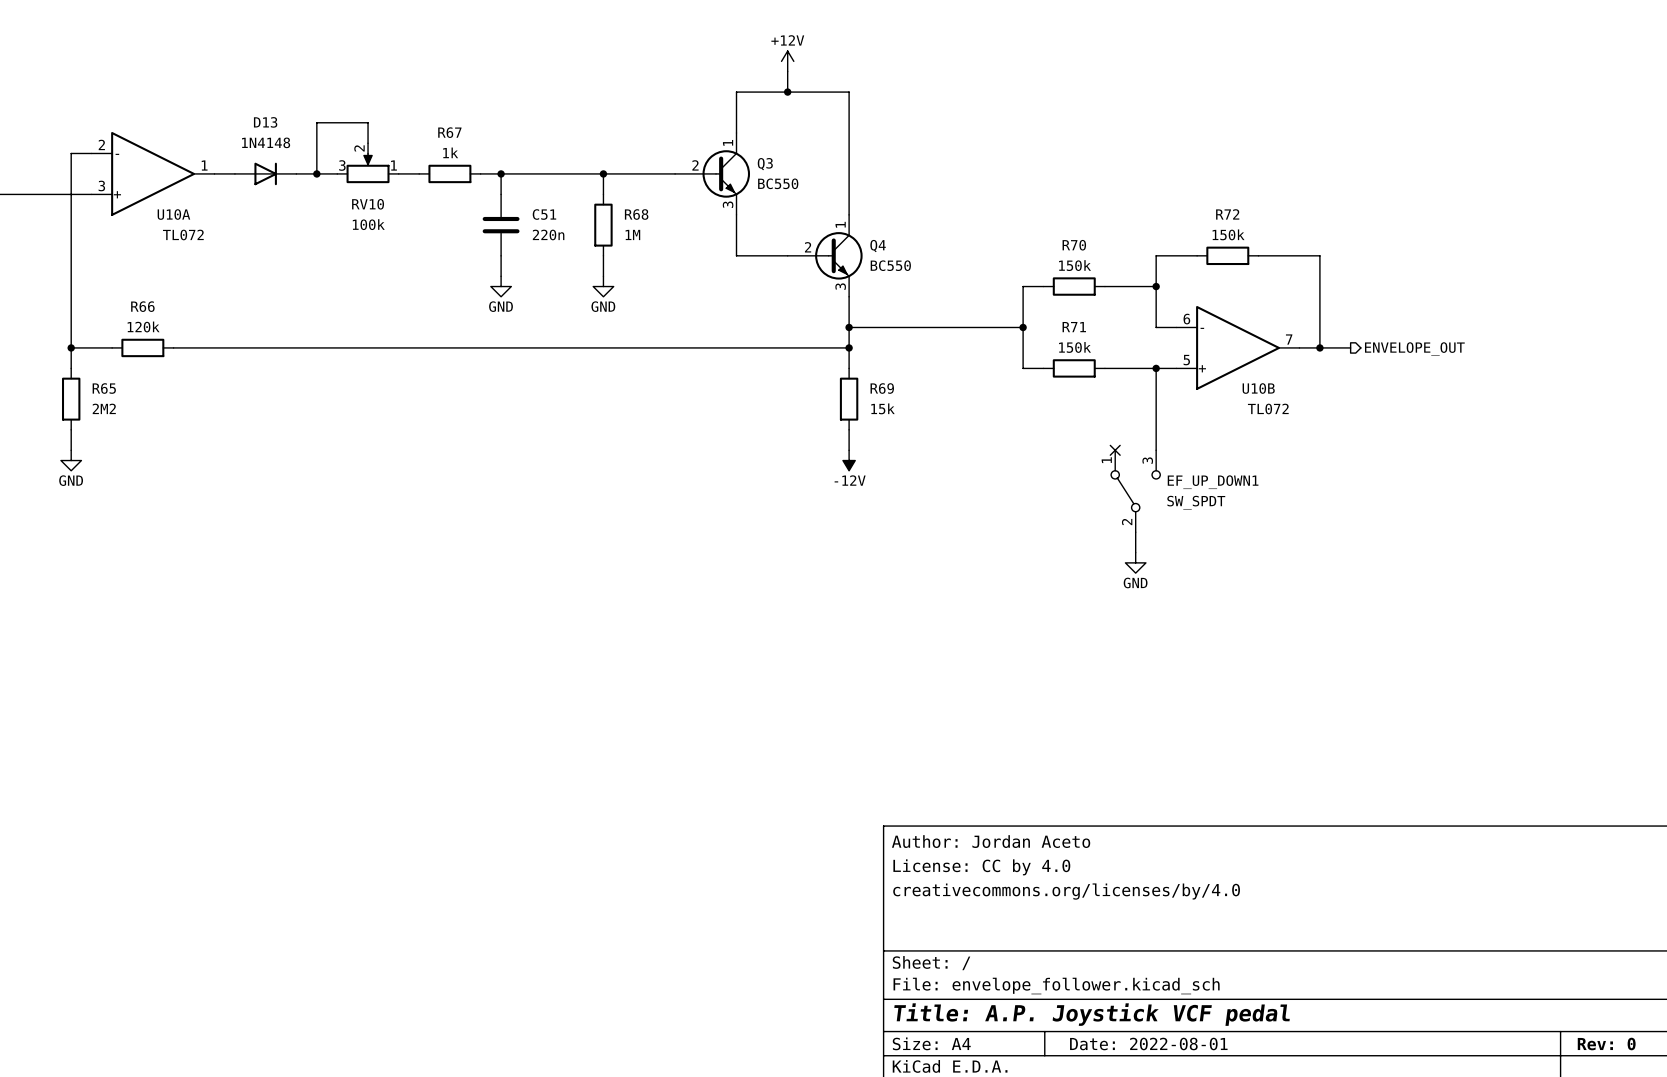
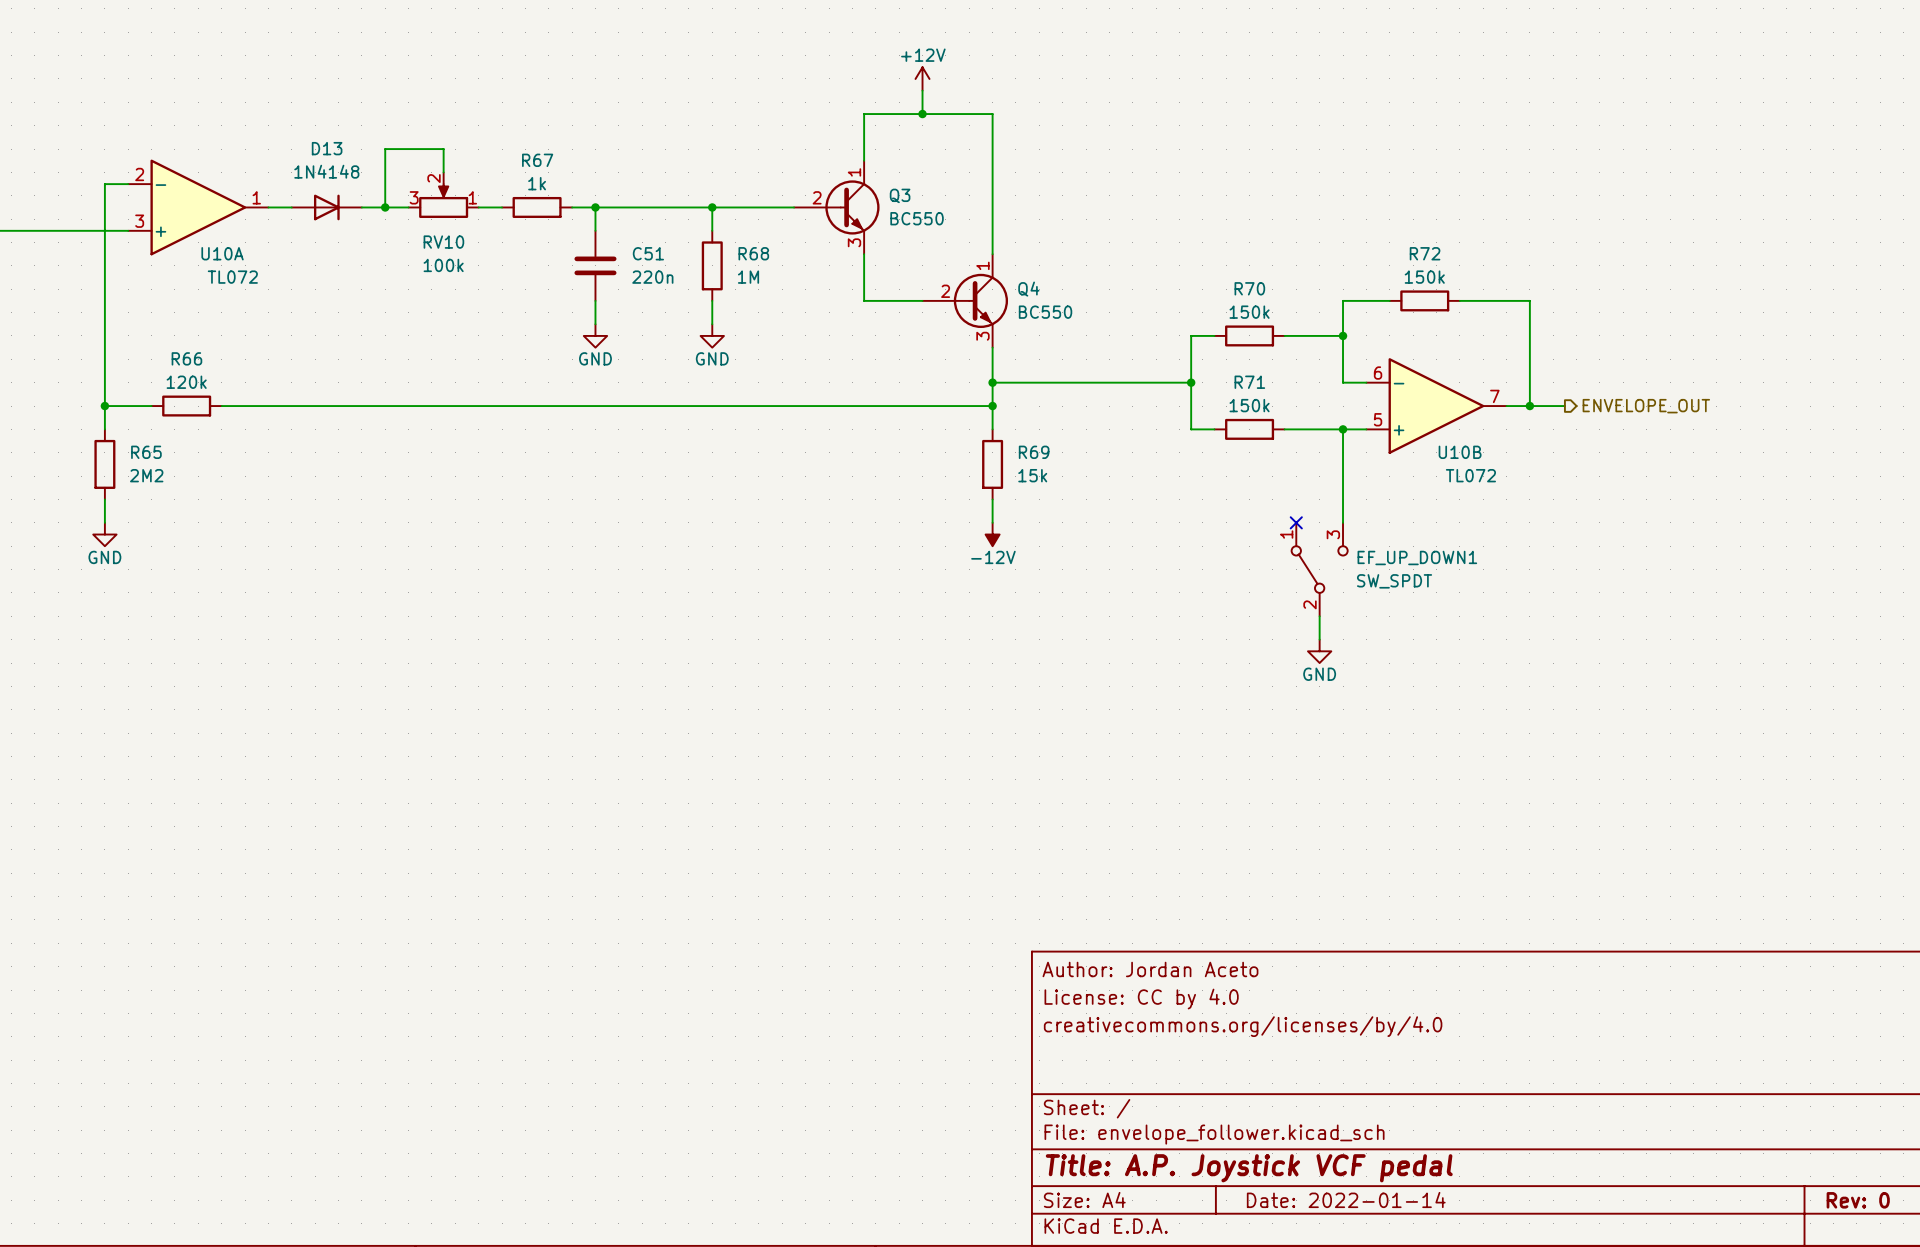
title block: Date: 2022-08-01 (1148, 1044) -> Date: 2022-01-14 (1346, 1199)

